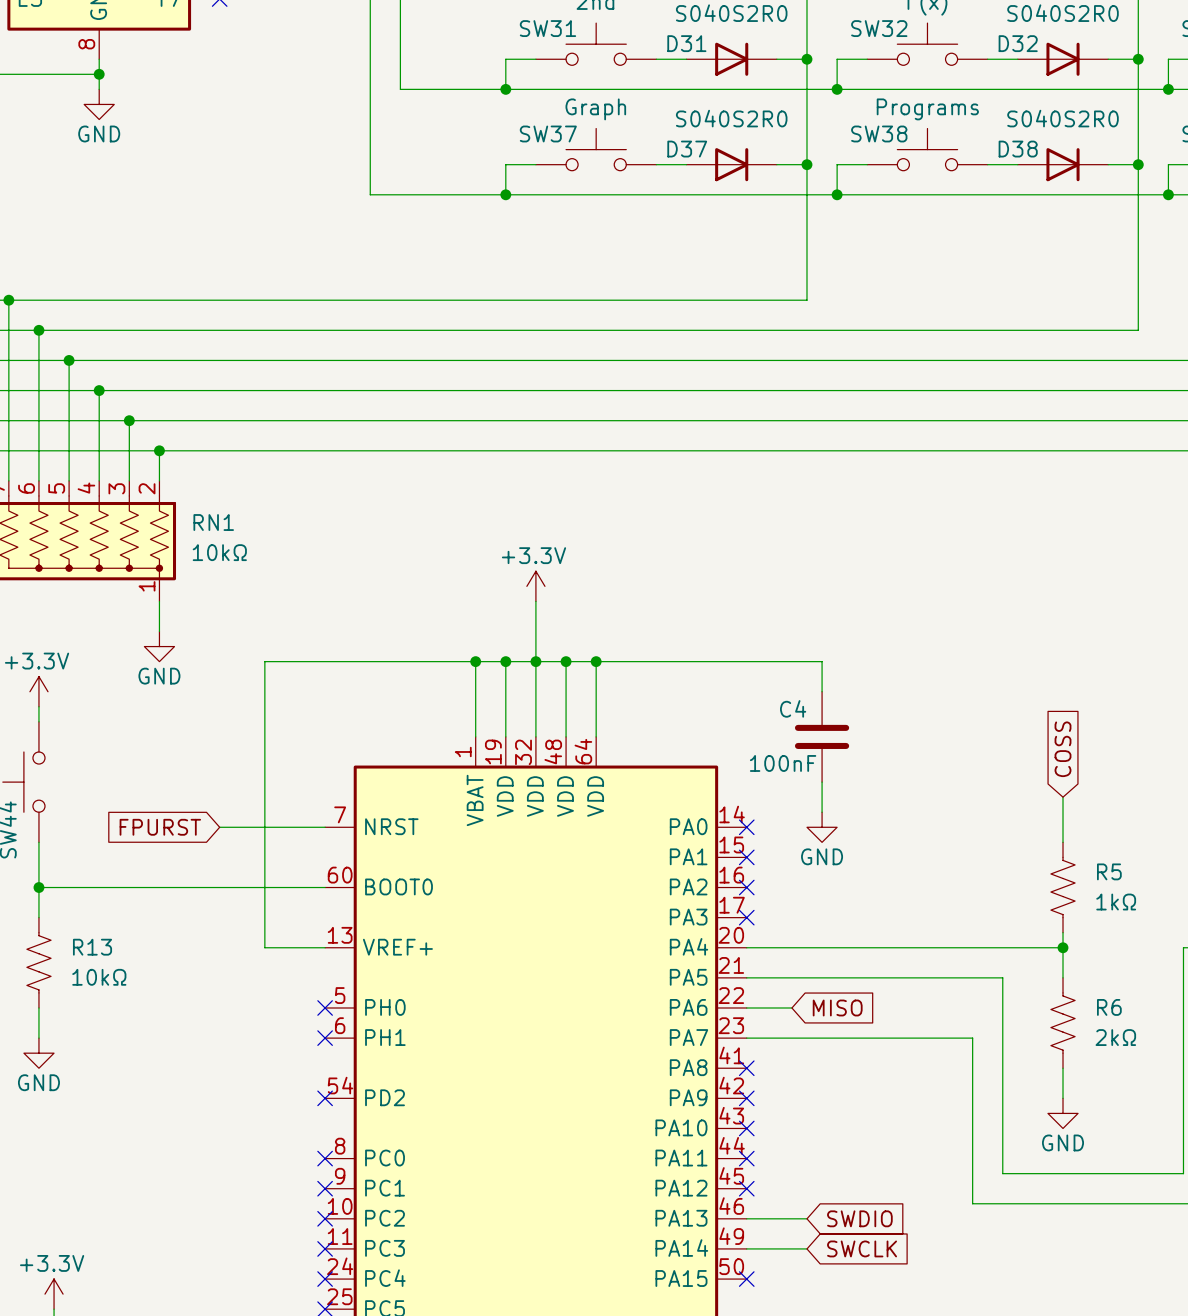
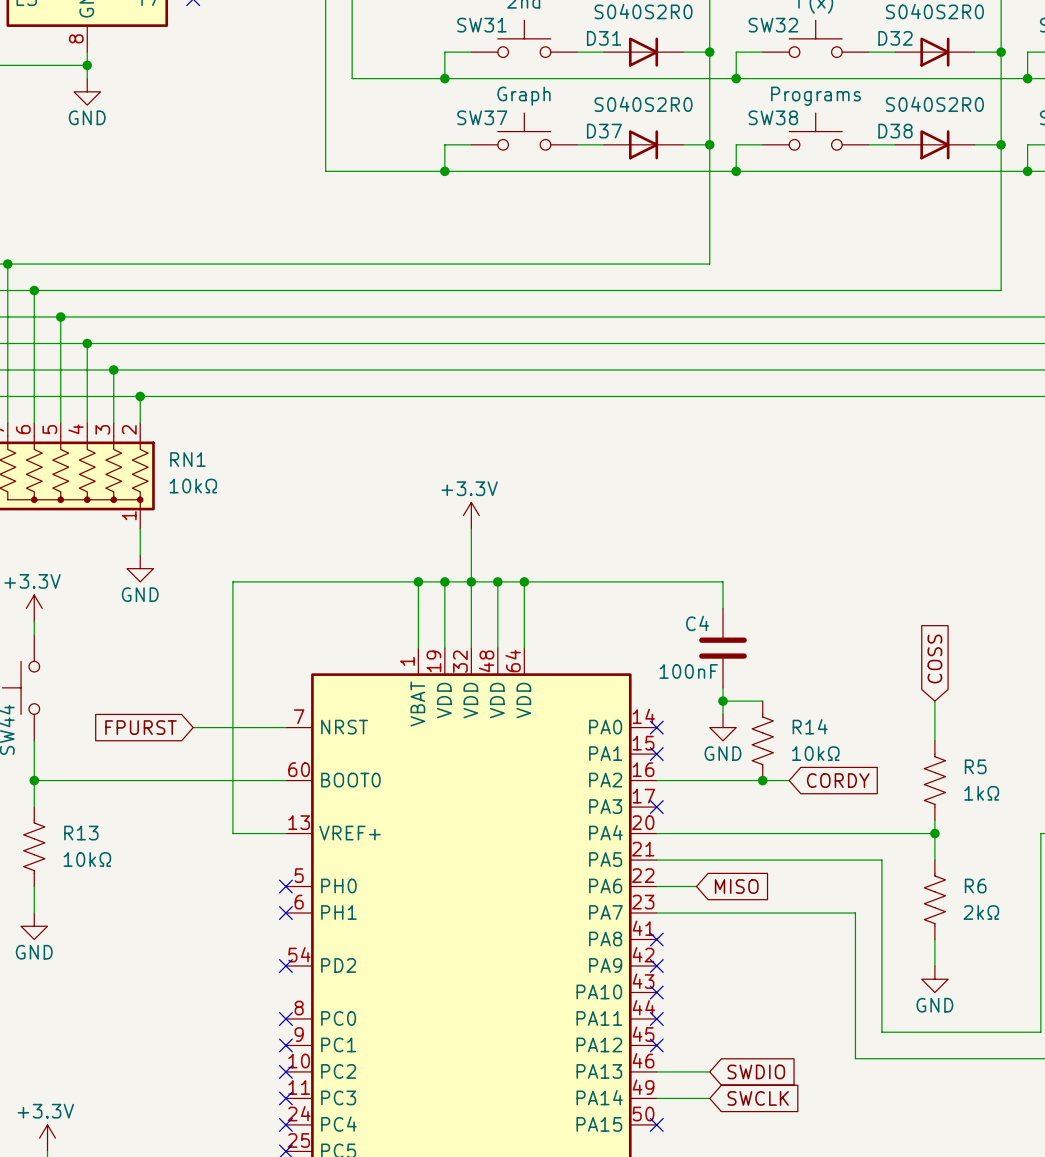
wire: none -> (722, 701) (762, 701)
junction: none -> (722, 701)
R14: none -> 10kΩ (762, 740)
wire: none -> (656, 780) (789, 780)
no-connect mark: (746, 887) -> none
junction: none -> (762, 780)
global label: none -> CORDY (838, 780)

